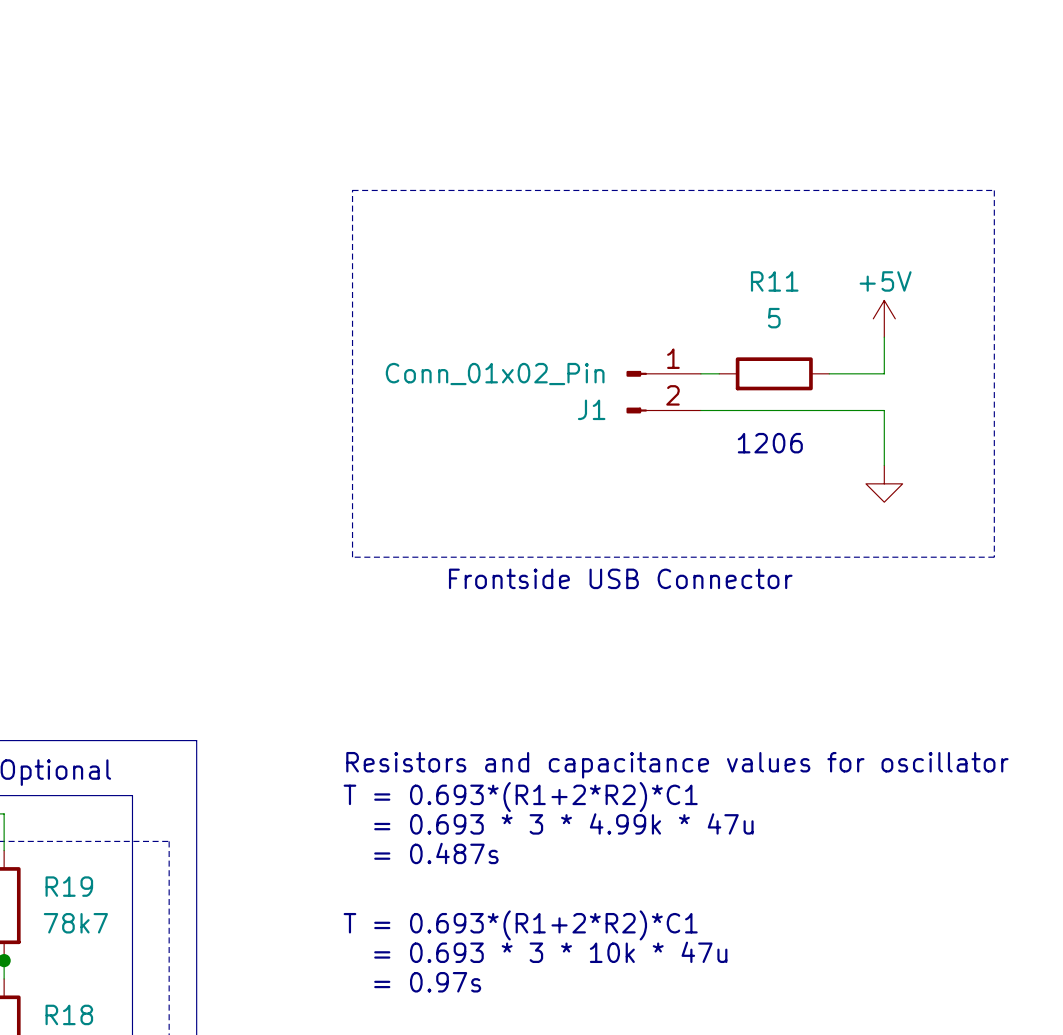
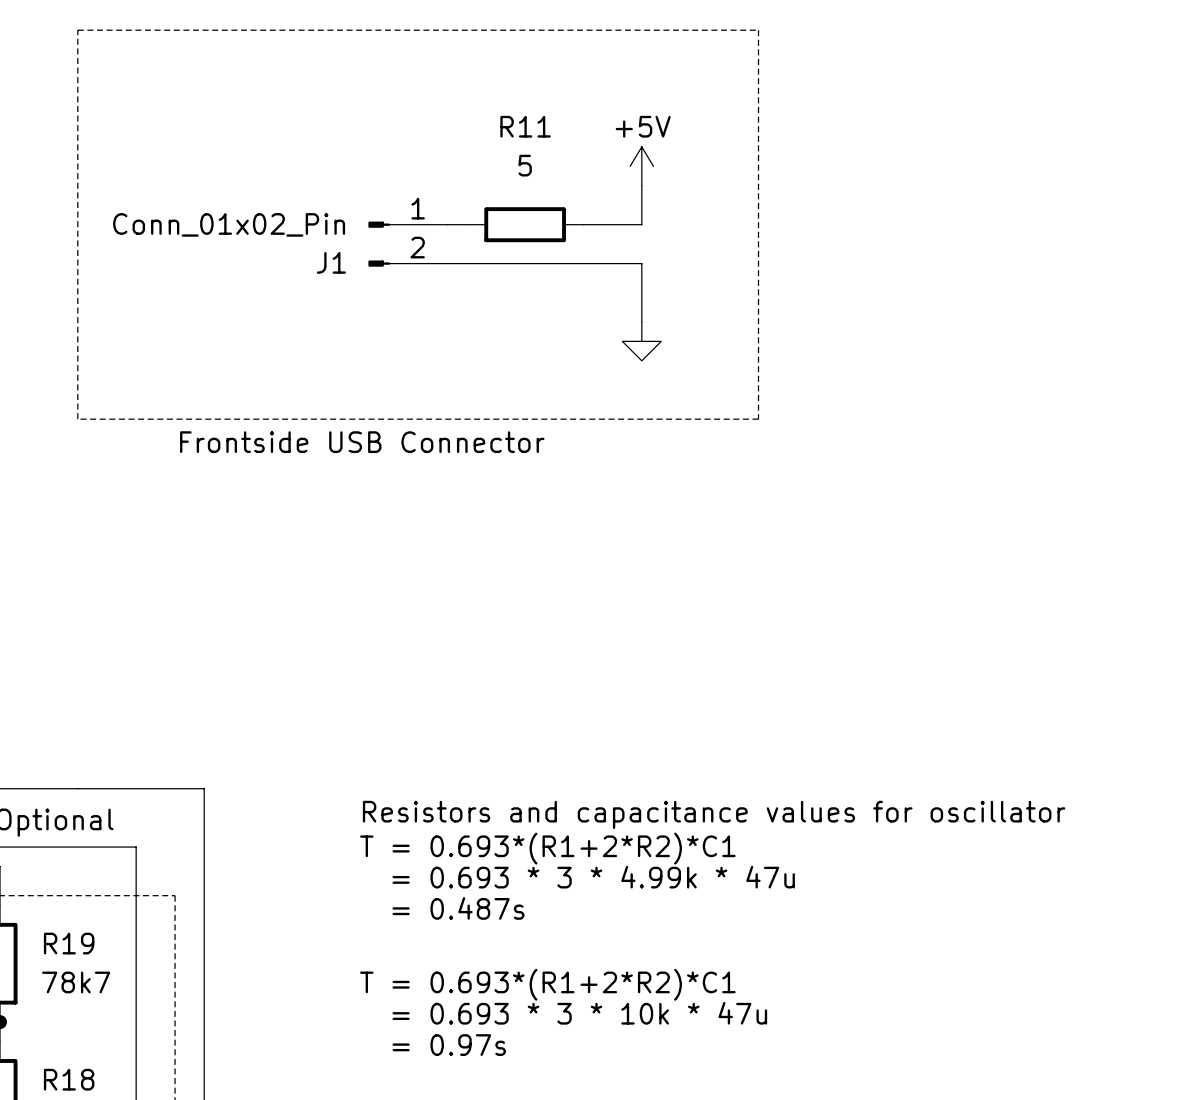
line: (352, 190) (994, 190) (994, 557) (352, 557) (352, 190) -> (77, 30) (758, 30) (758, 419) (77, 419) (77, 30)
power symbol position: +5V (884, 318) -> +5V (641, 166)
wire: (884, 337) (884, 373) (829, 373) -> (641, 185) (641, 224) (583, 224)
wire: (700, 373) (719, 373) -> (447, 224) (466, 224)
R11 position: (774, 373) -> (525, 224)
J1 position: (663, 392) -> (407, 244)
wire: (700, 410) (884, 410) (884, 465) -> (447, 263) (641, 263) (641, 321)
text: 1206 (770, 443) -> none
power symbol position: (884, 483) -> (641, 341)
text position: Frontside USB Connector (620, 578) -> Frontside USB Connector (362, 442)

